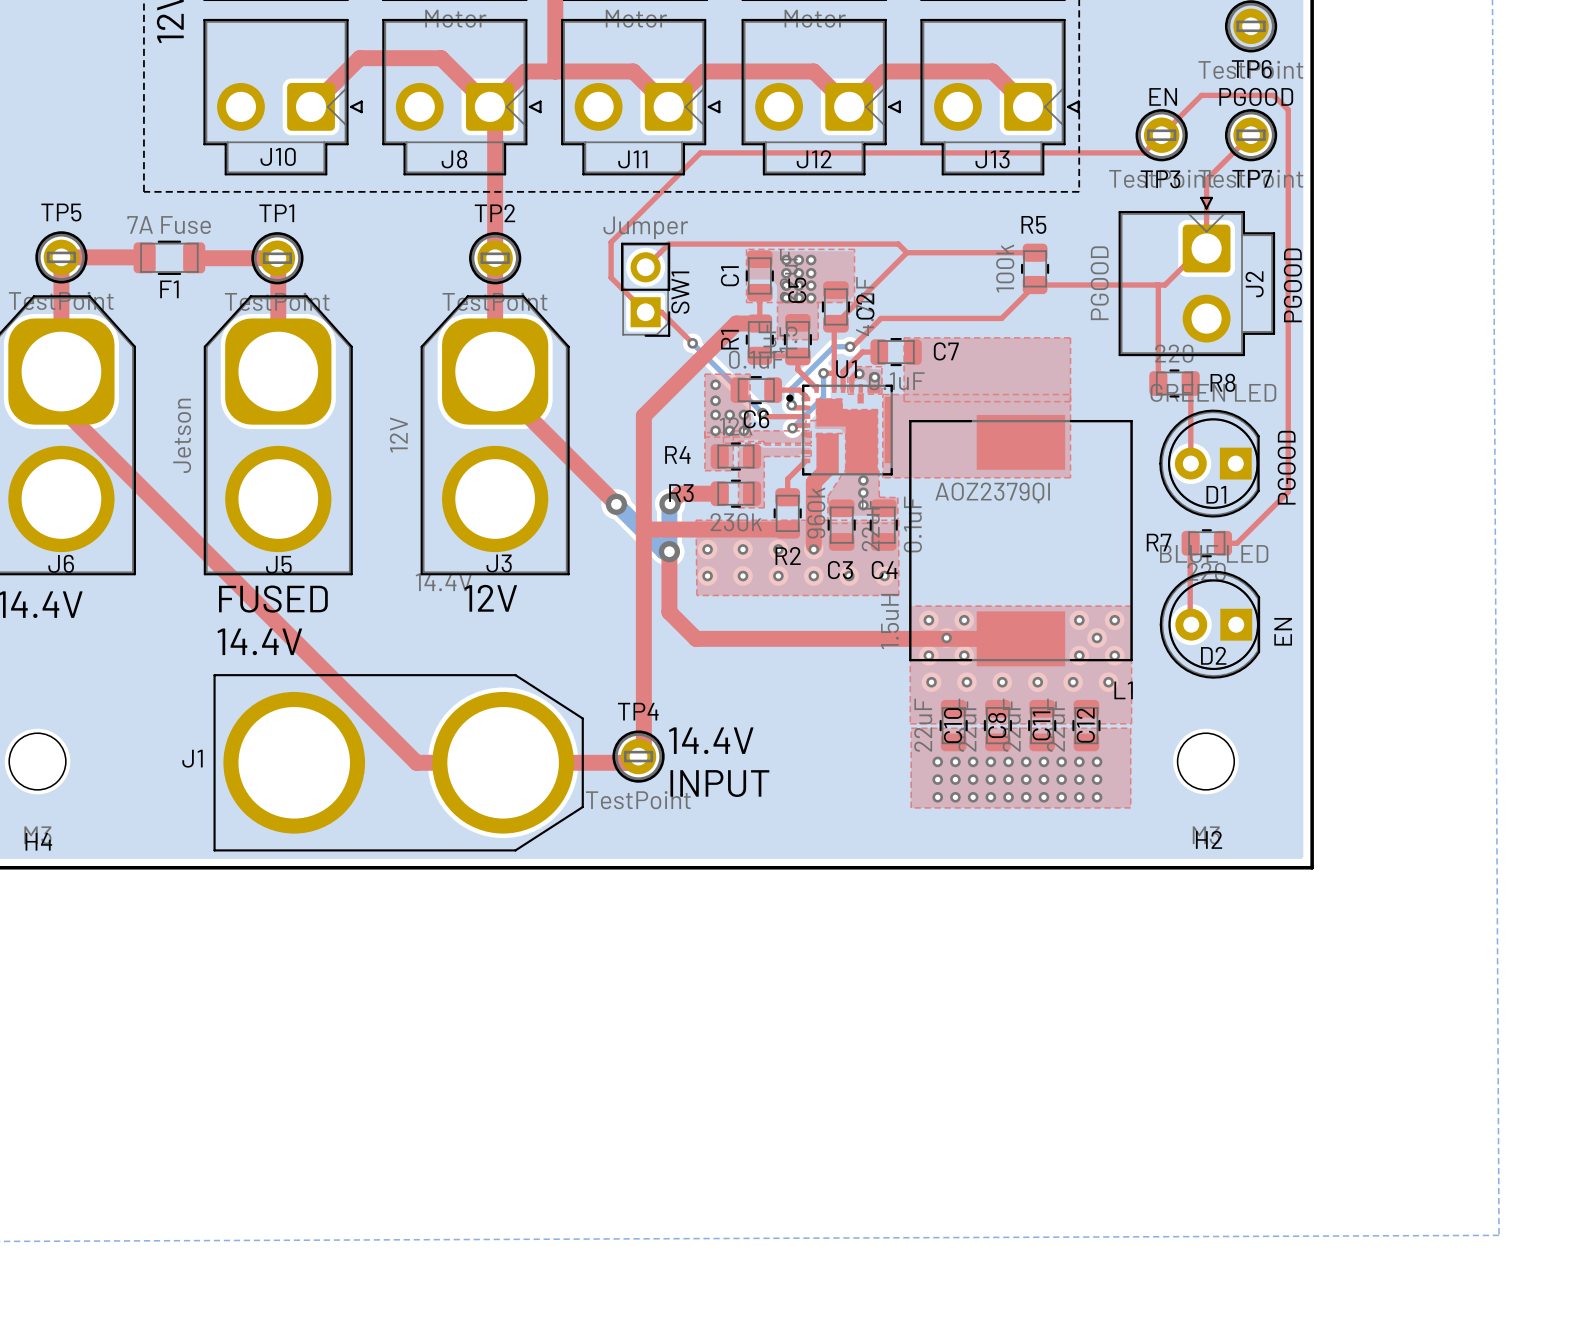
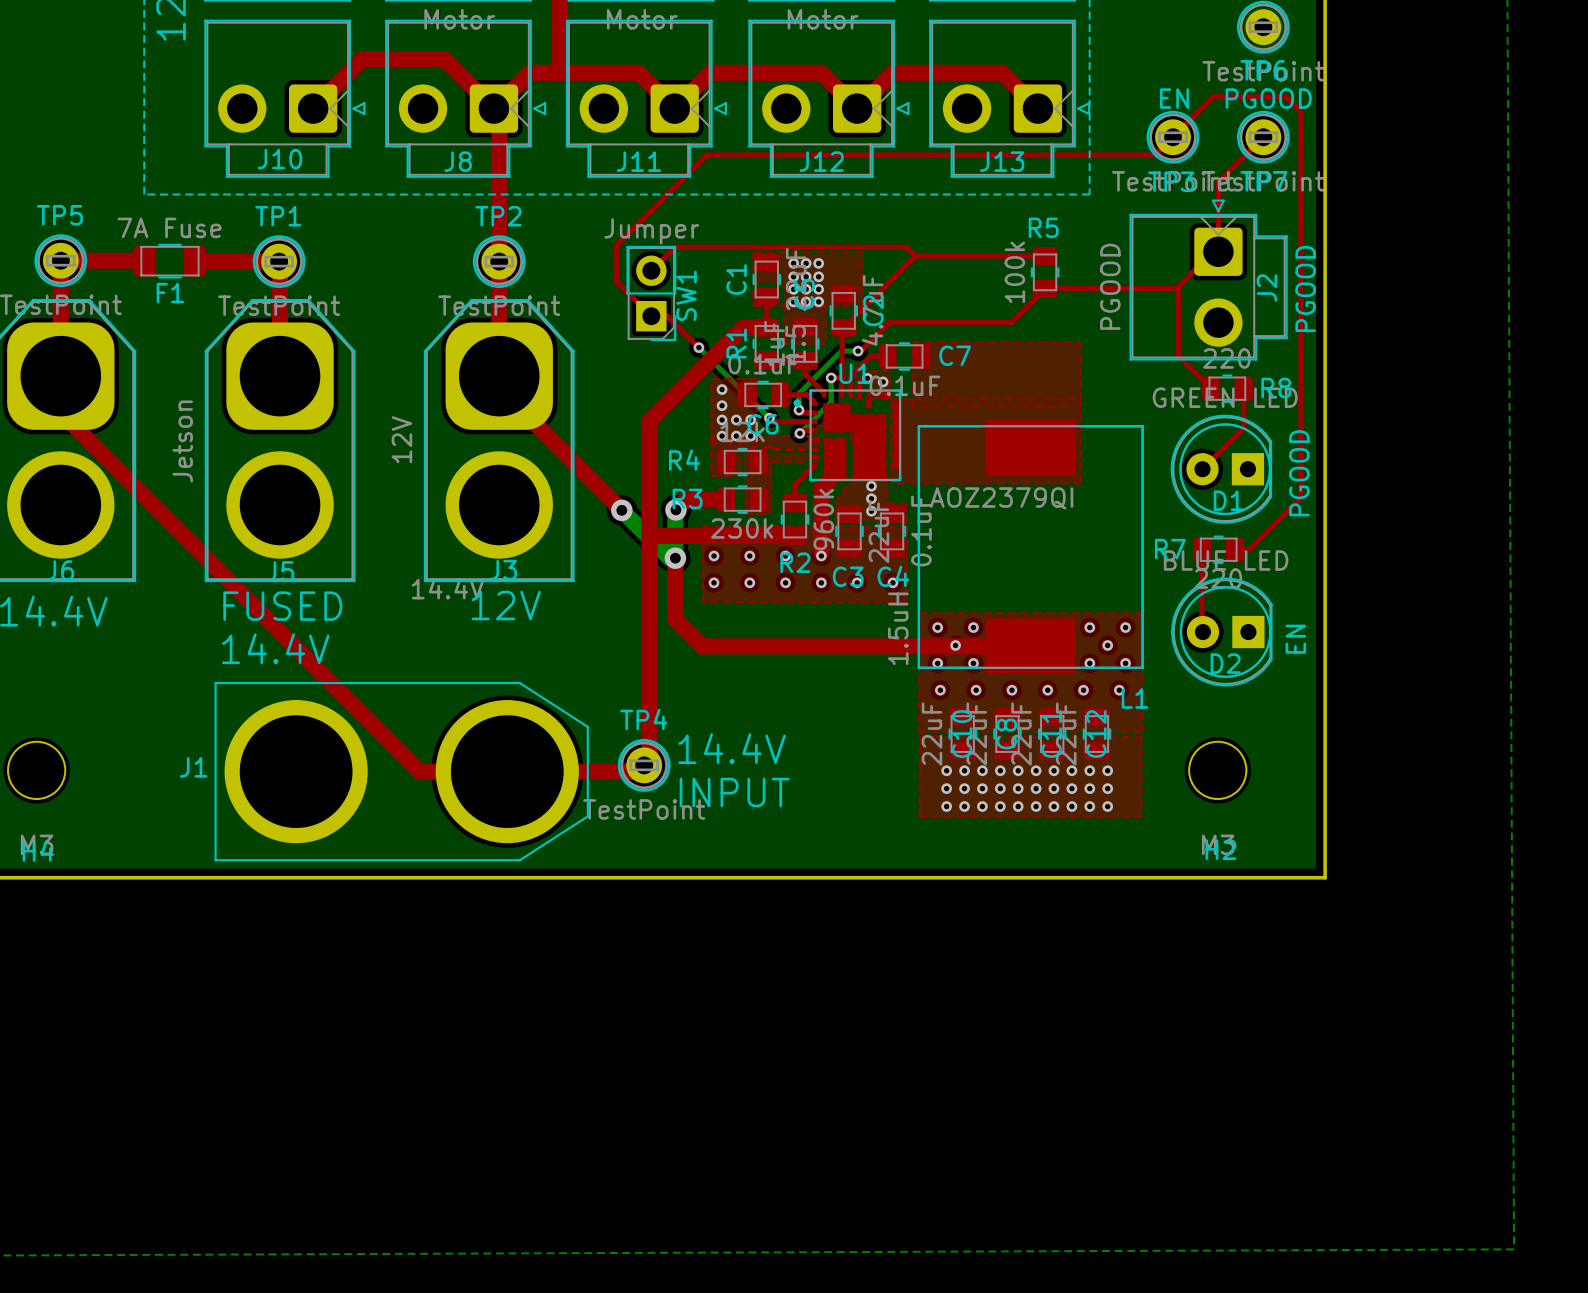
top track: none -> (1178, 286) (1178, 356) (1211, 388)
top track: (1158, 285) (1158, 383) -> none
R8 position: (1174, 383) -> (1227, 388)
top track: (1190, 383) (1190, 463) -> (1243, 388) (1243, 427) (1202, 469)

